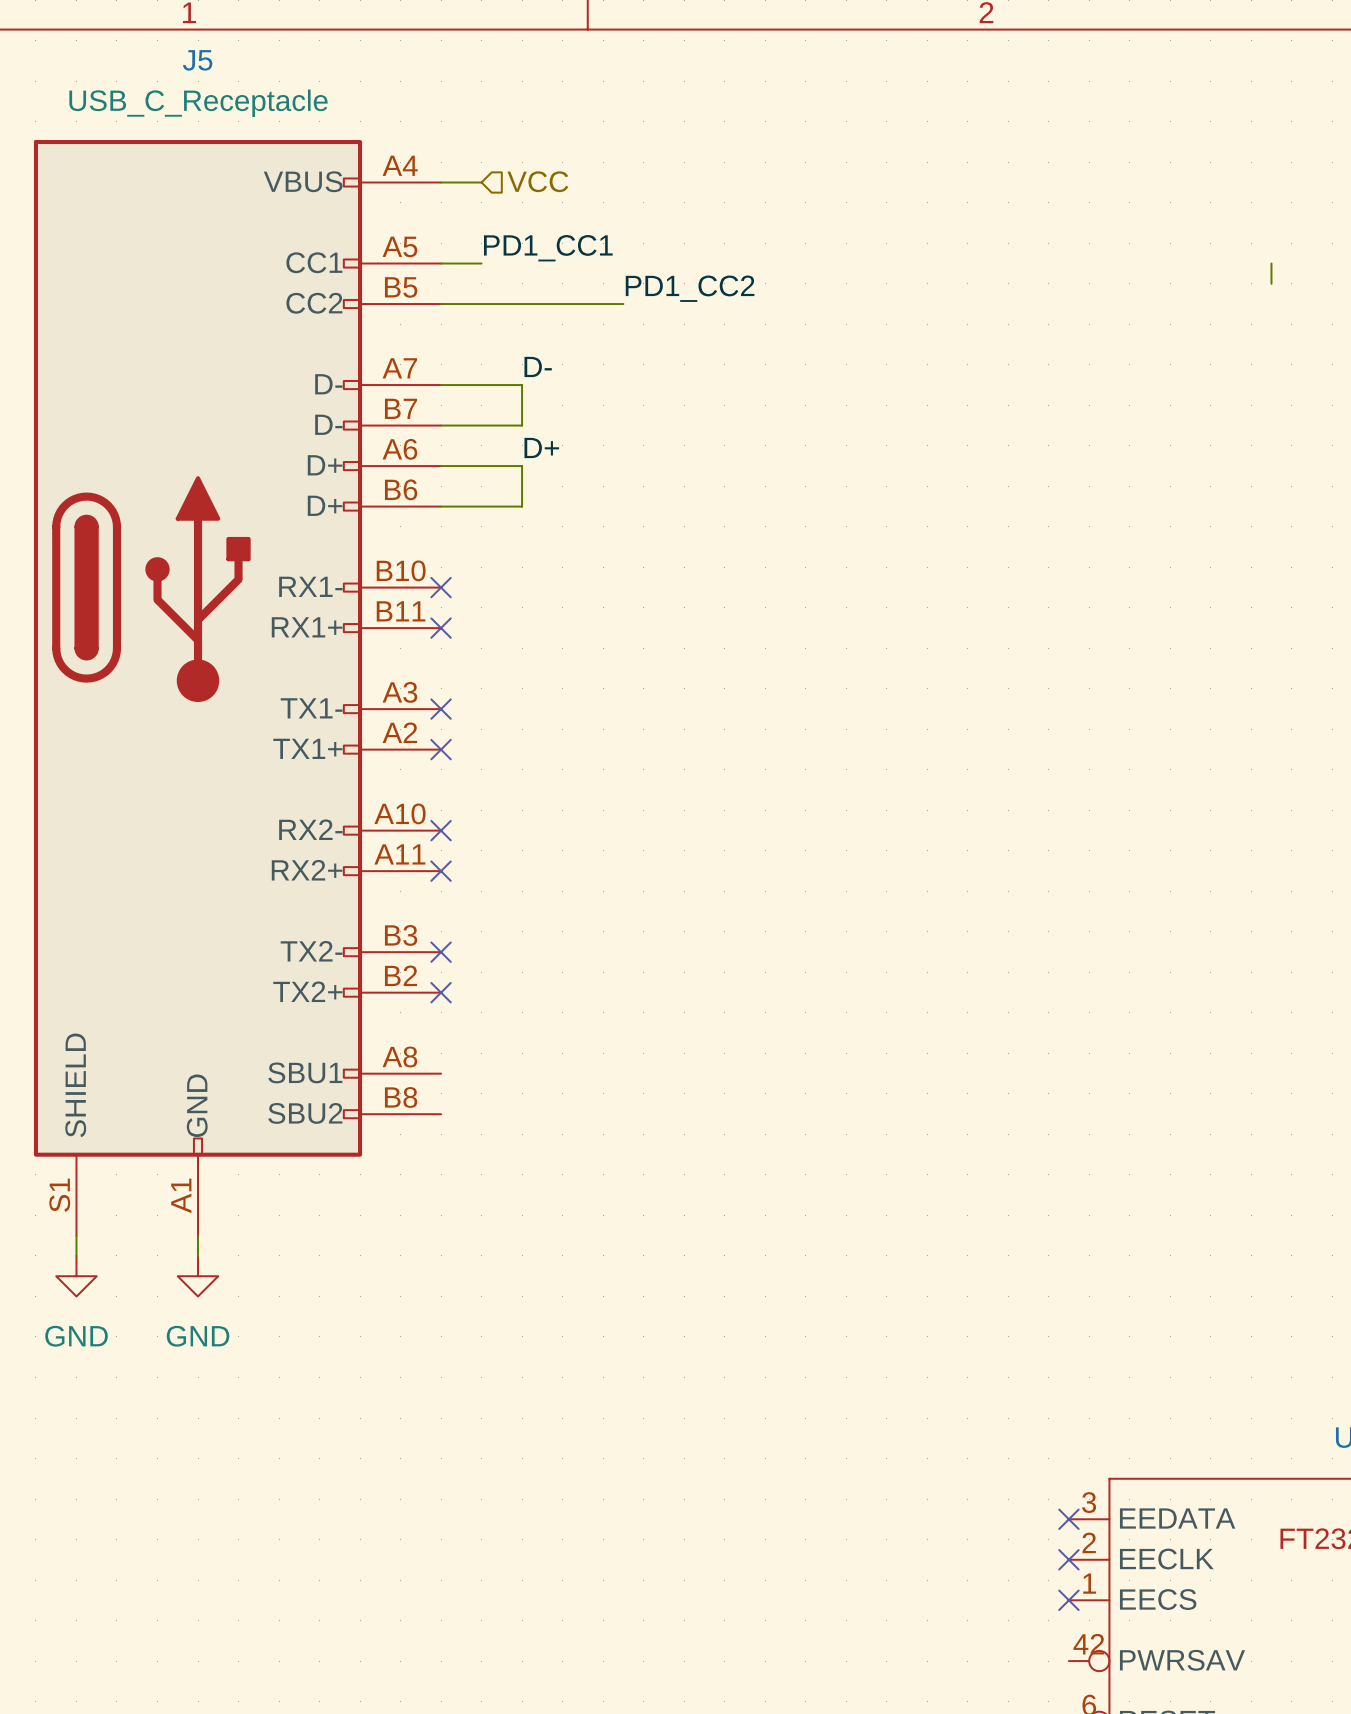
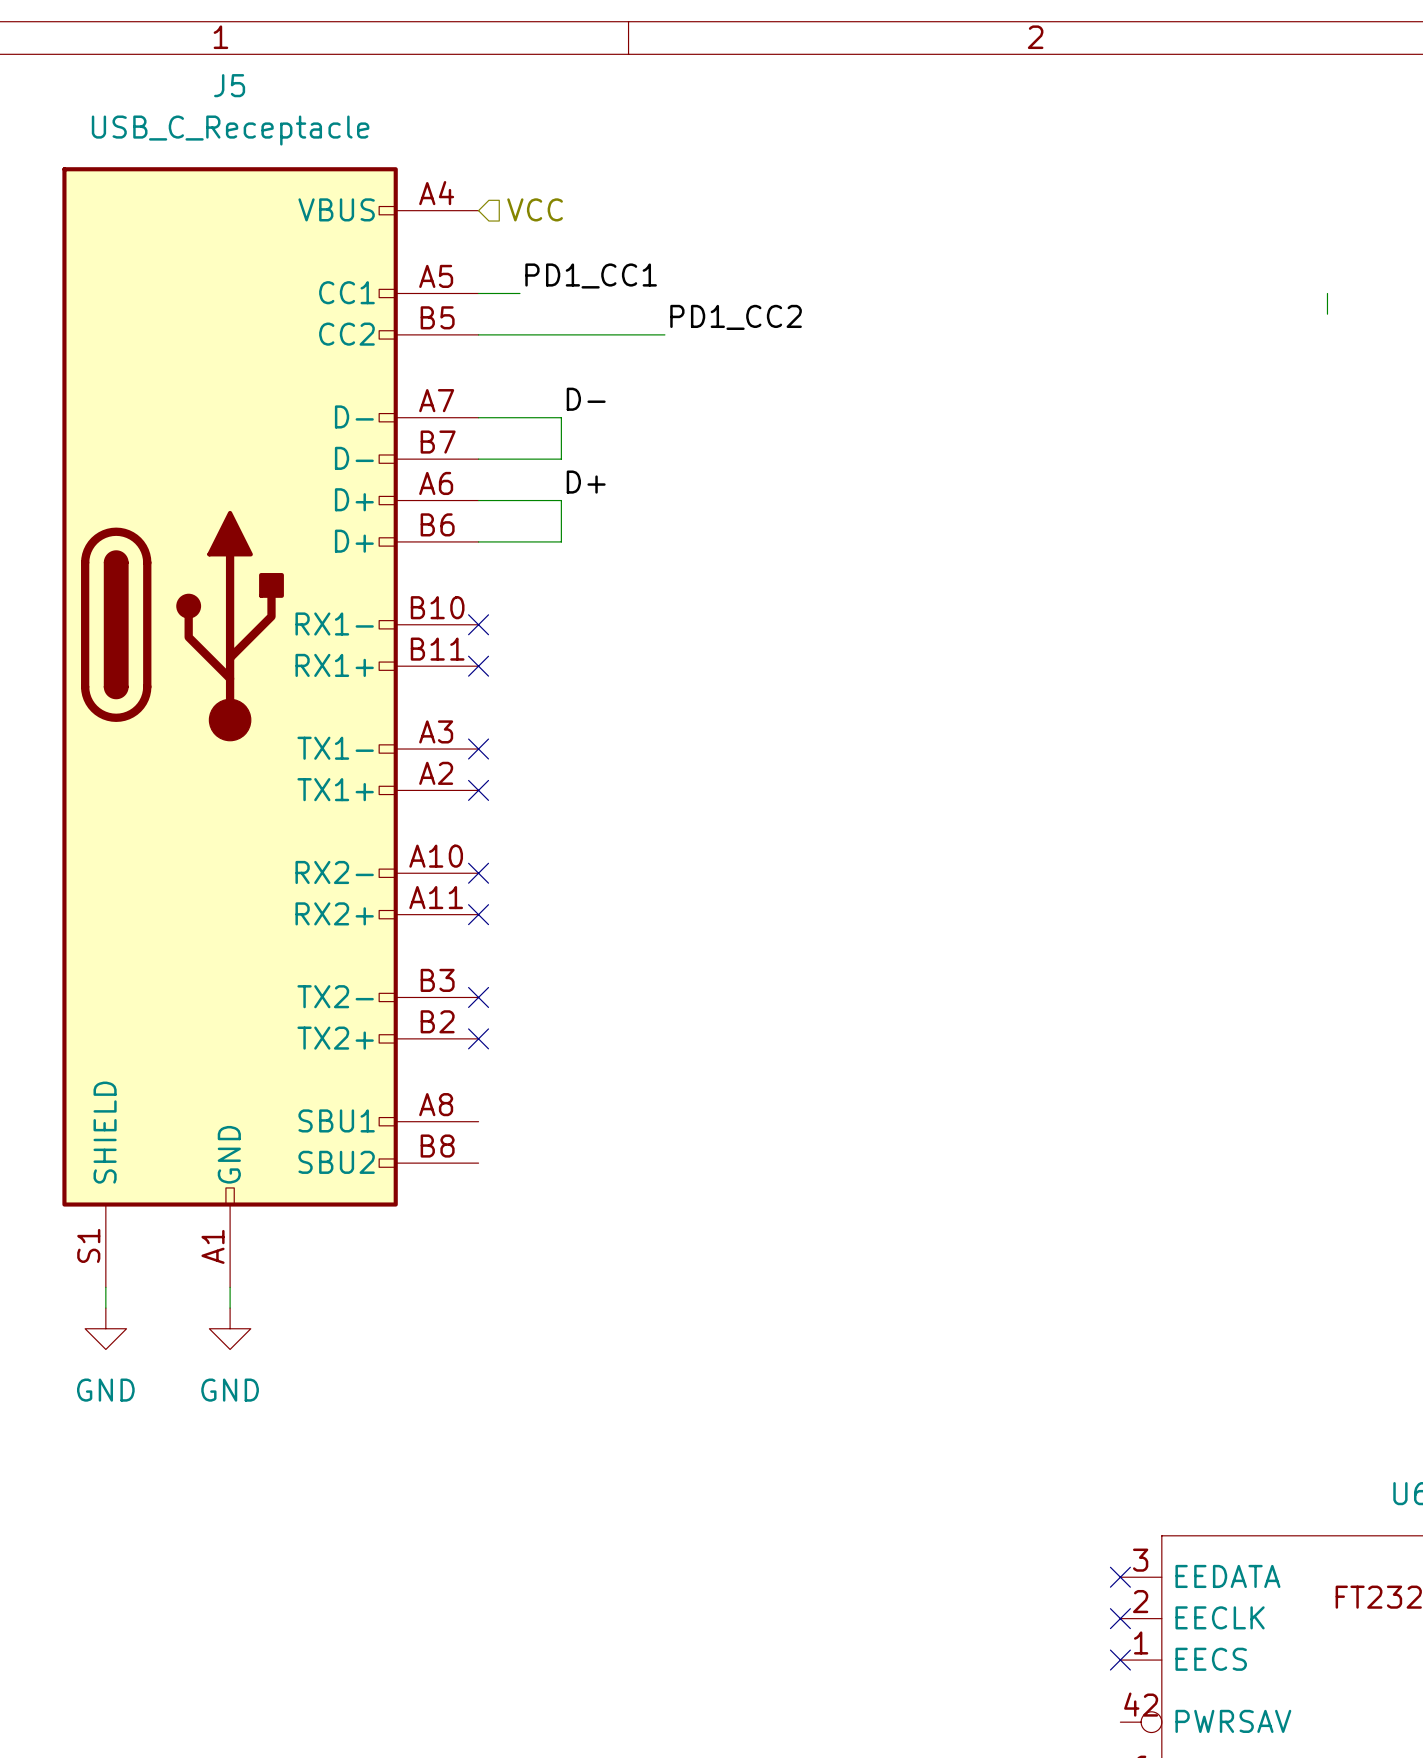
hierarchical label position: VCC (537, 181) -> VCC (535, 209)
wire: (441, 182) (481, 182) -> none

